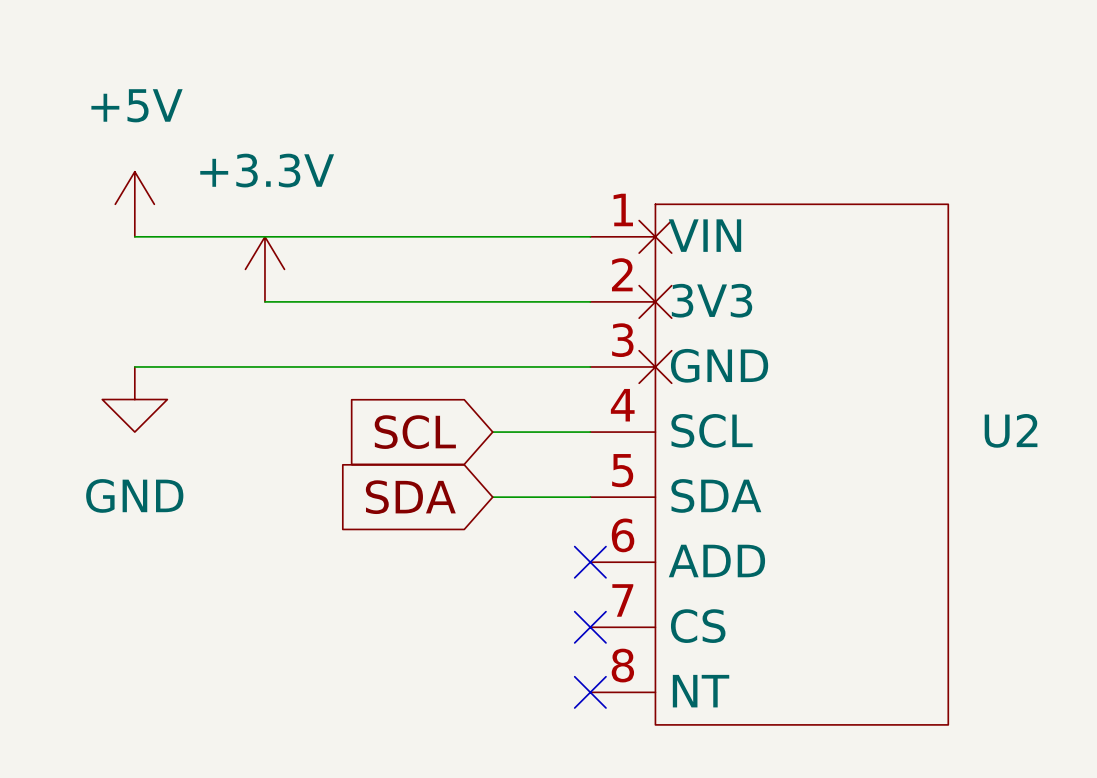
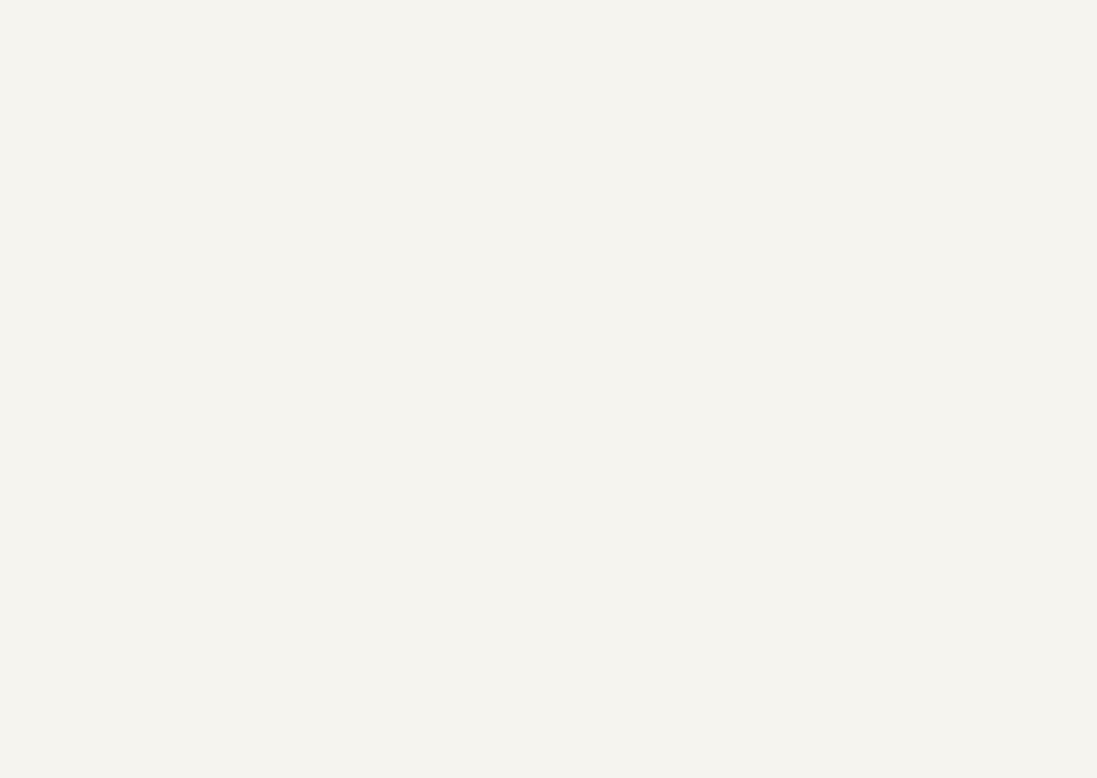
power symbol: +5V (134, 204) -> none
wire: (134, 236) (590, 236) -> none
power symbol: +3.3V (264, 269) -> none
wire: (264, 301) (590, 301) -> none
wire: (134, 366) (590, 366) -> none
power symbol: GND (134, 399) -> none
global label: SCL (415, 432) -> none
wire: (492, 432) (590, 432) -> none
U2: (769, 464) -> none
global label: SDA (410, 497) -> none
wire: (492, 497) (590, 497) -> none
no-connect mark: (590, 562) -> none
no-connect mark: (590, 627) -> none
no-connect mark: (590, 692) -> none

